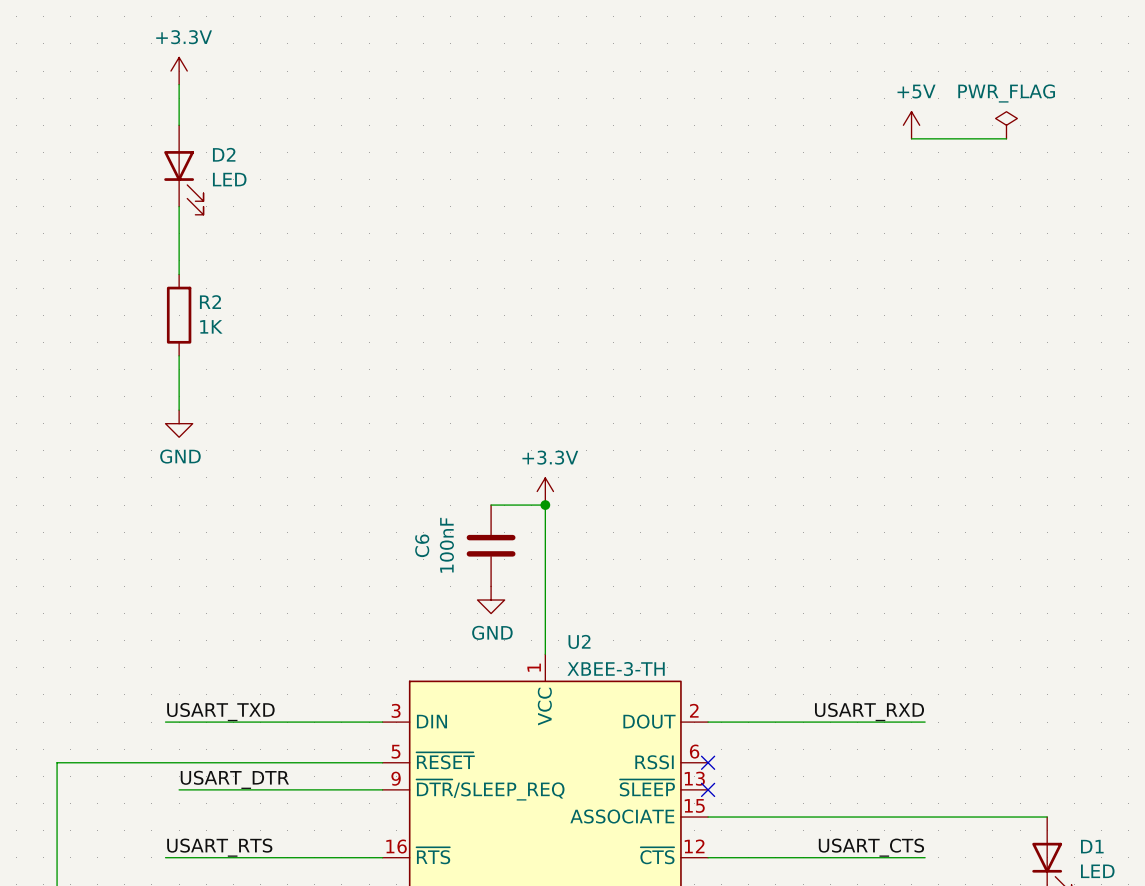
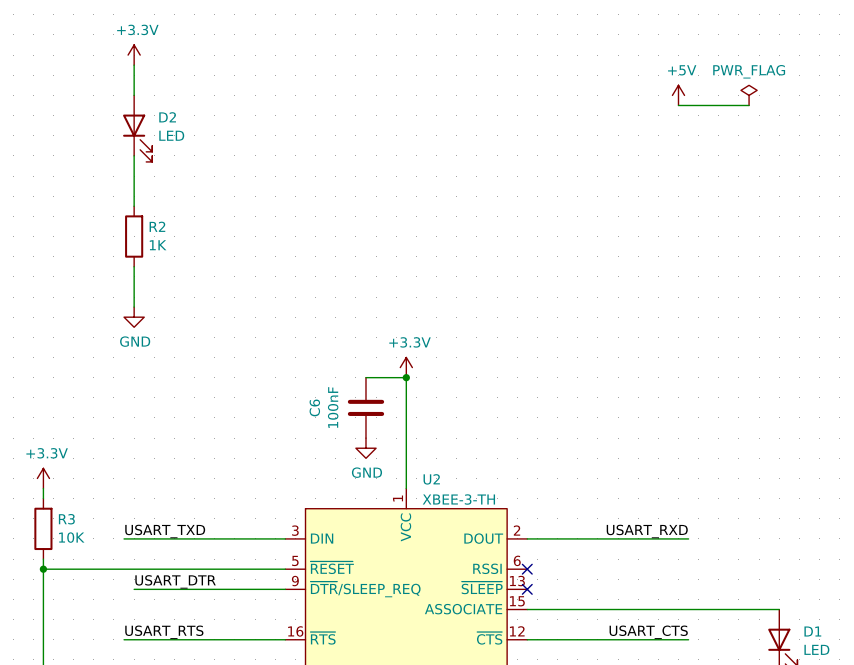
power symbol: none -> +3.3V (43, 478)
wire: none -> (43, 488) (43, 498)
R3: none -> 10K (43, 528)
wire: none -> (43, 559) (43, 569)
junction: none -> (43, 569)

